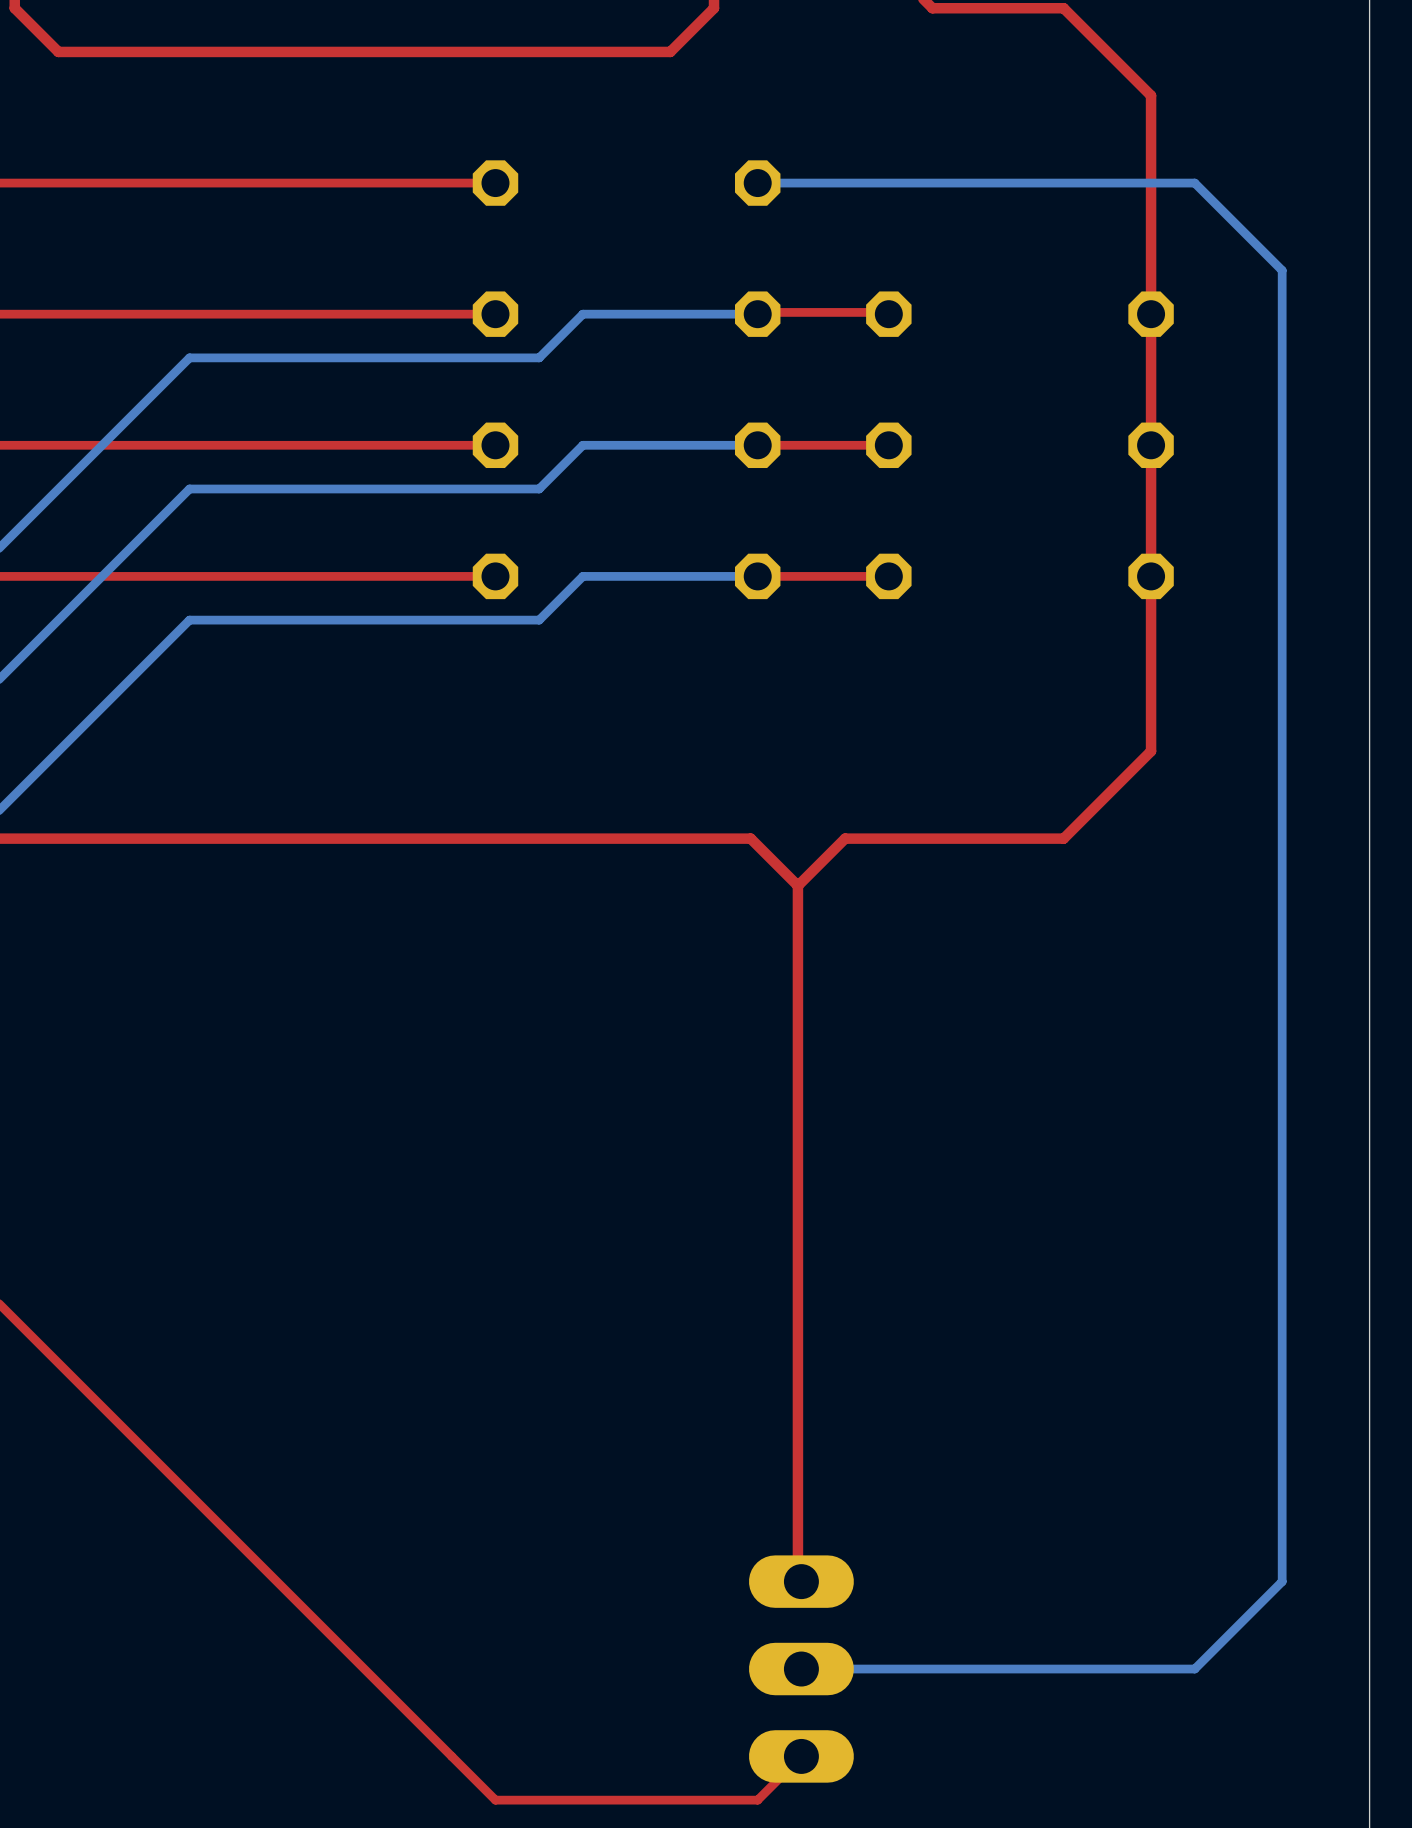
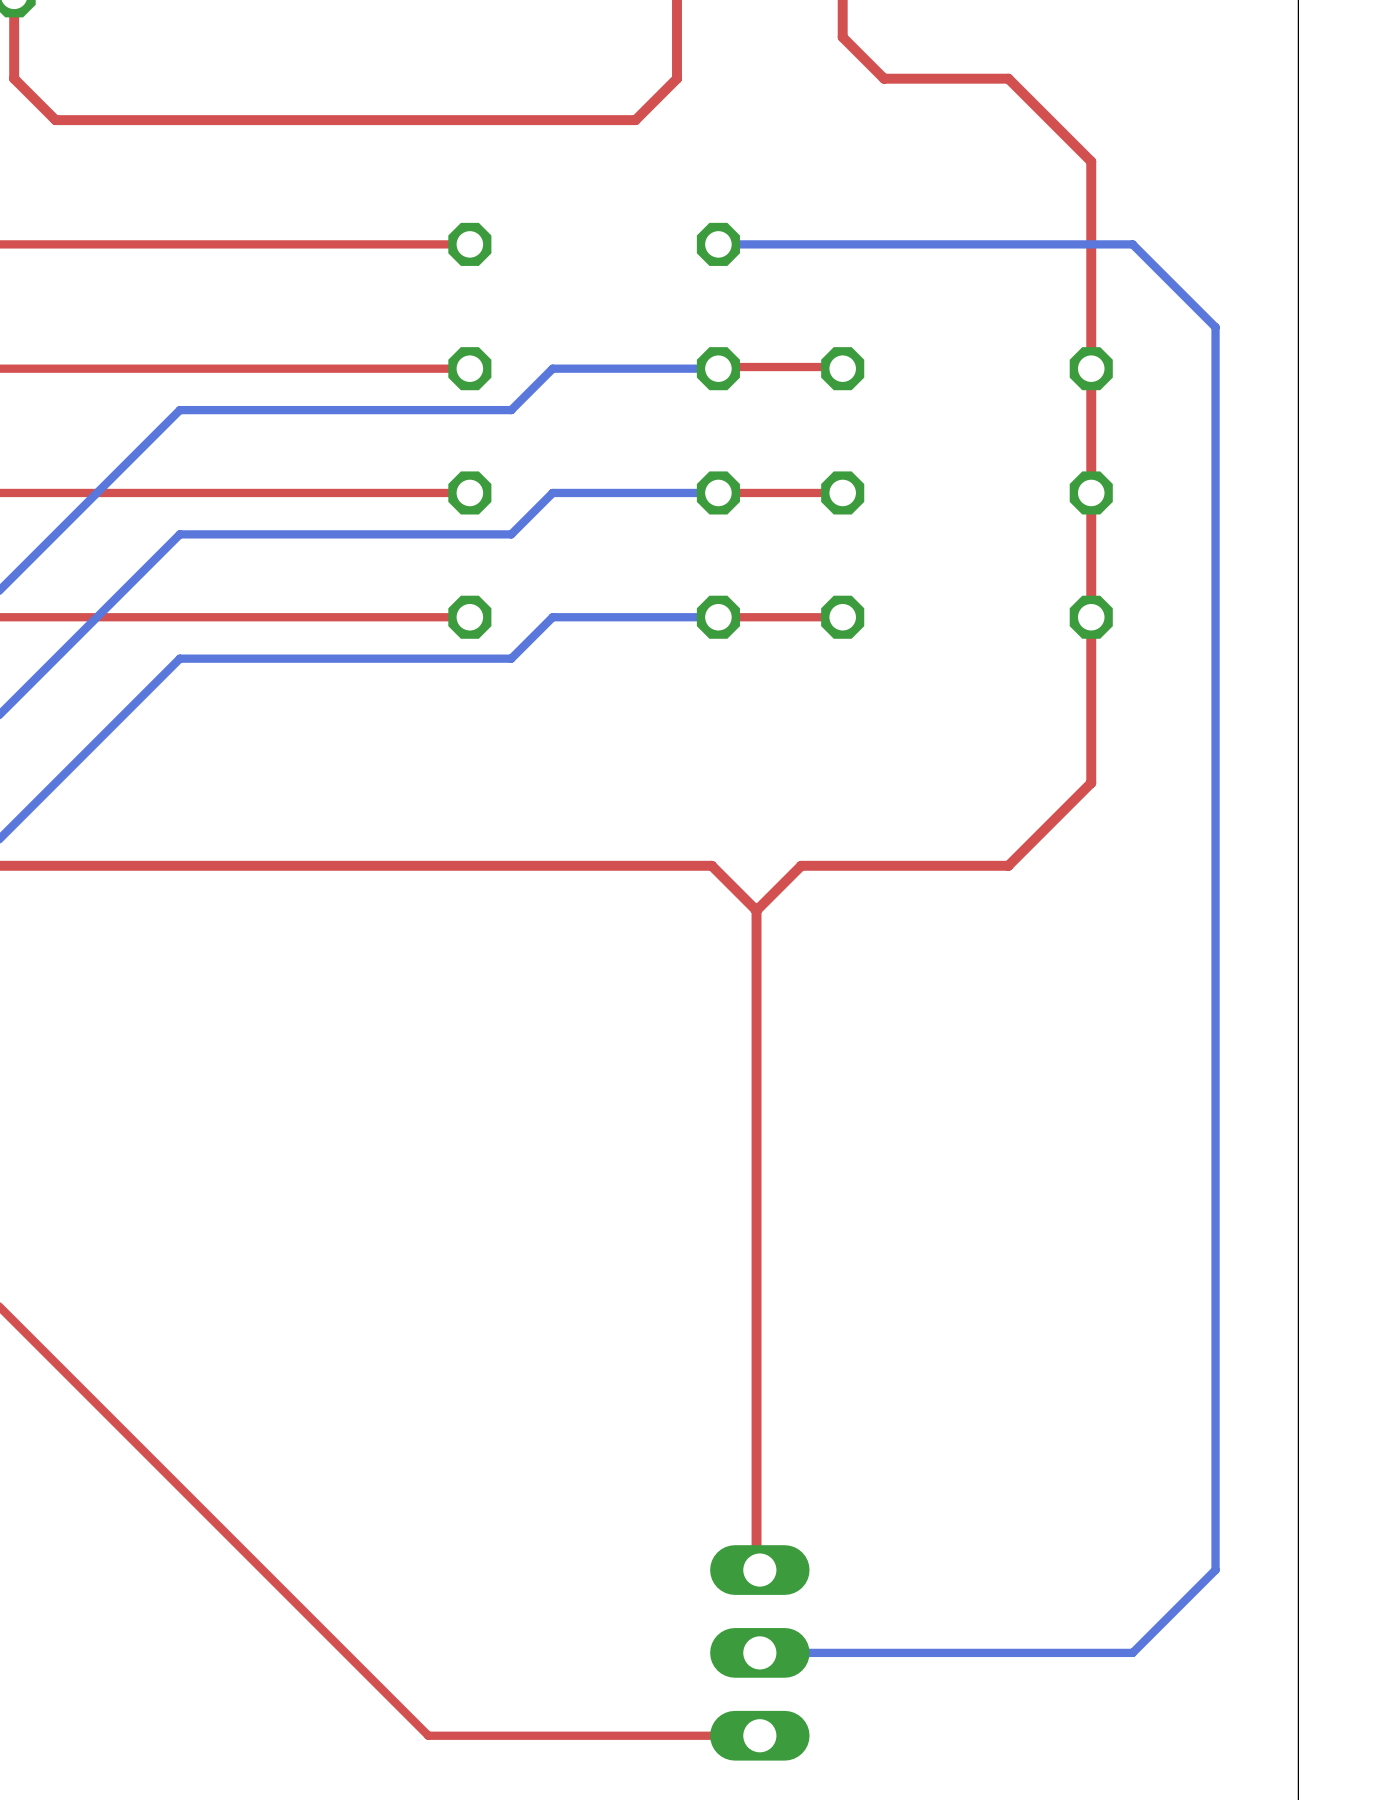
top track: (801, 1756) (757, 1800) (495, 1800) (451, 1756) -> (759, 1735) (428, 1735)

